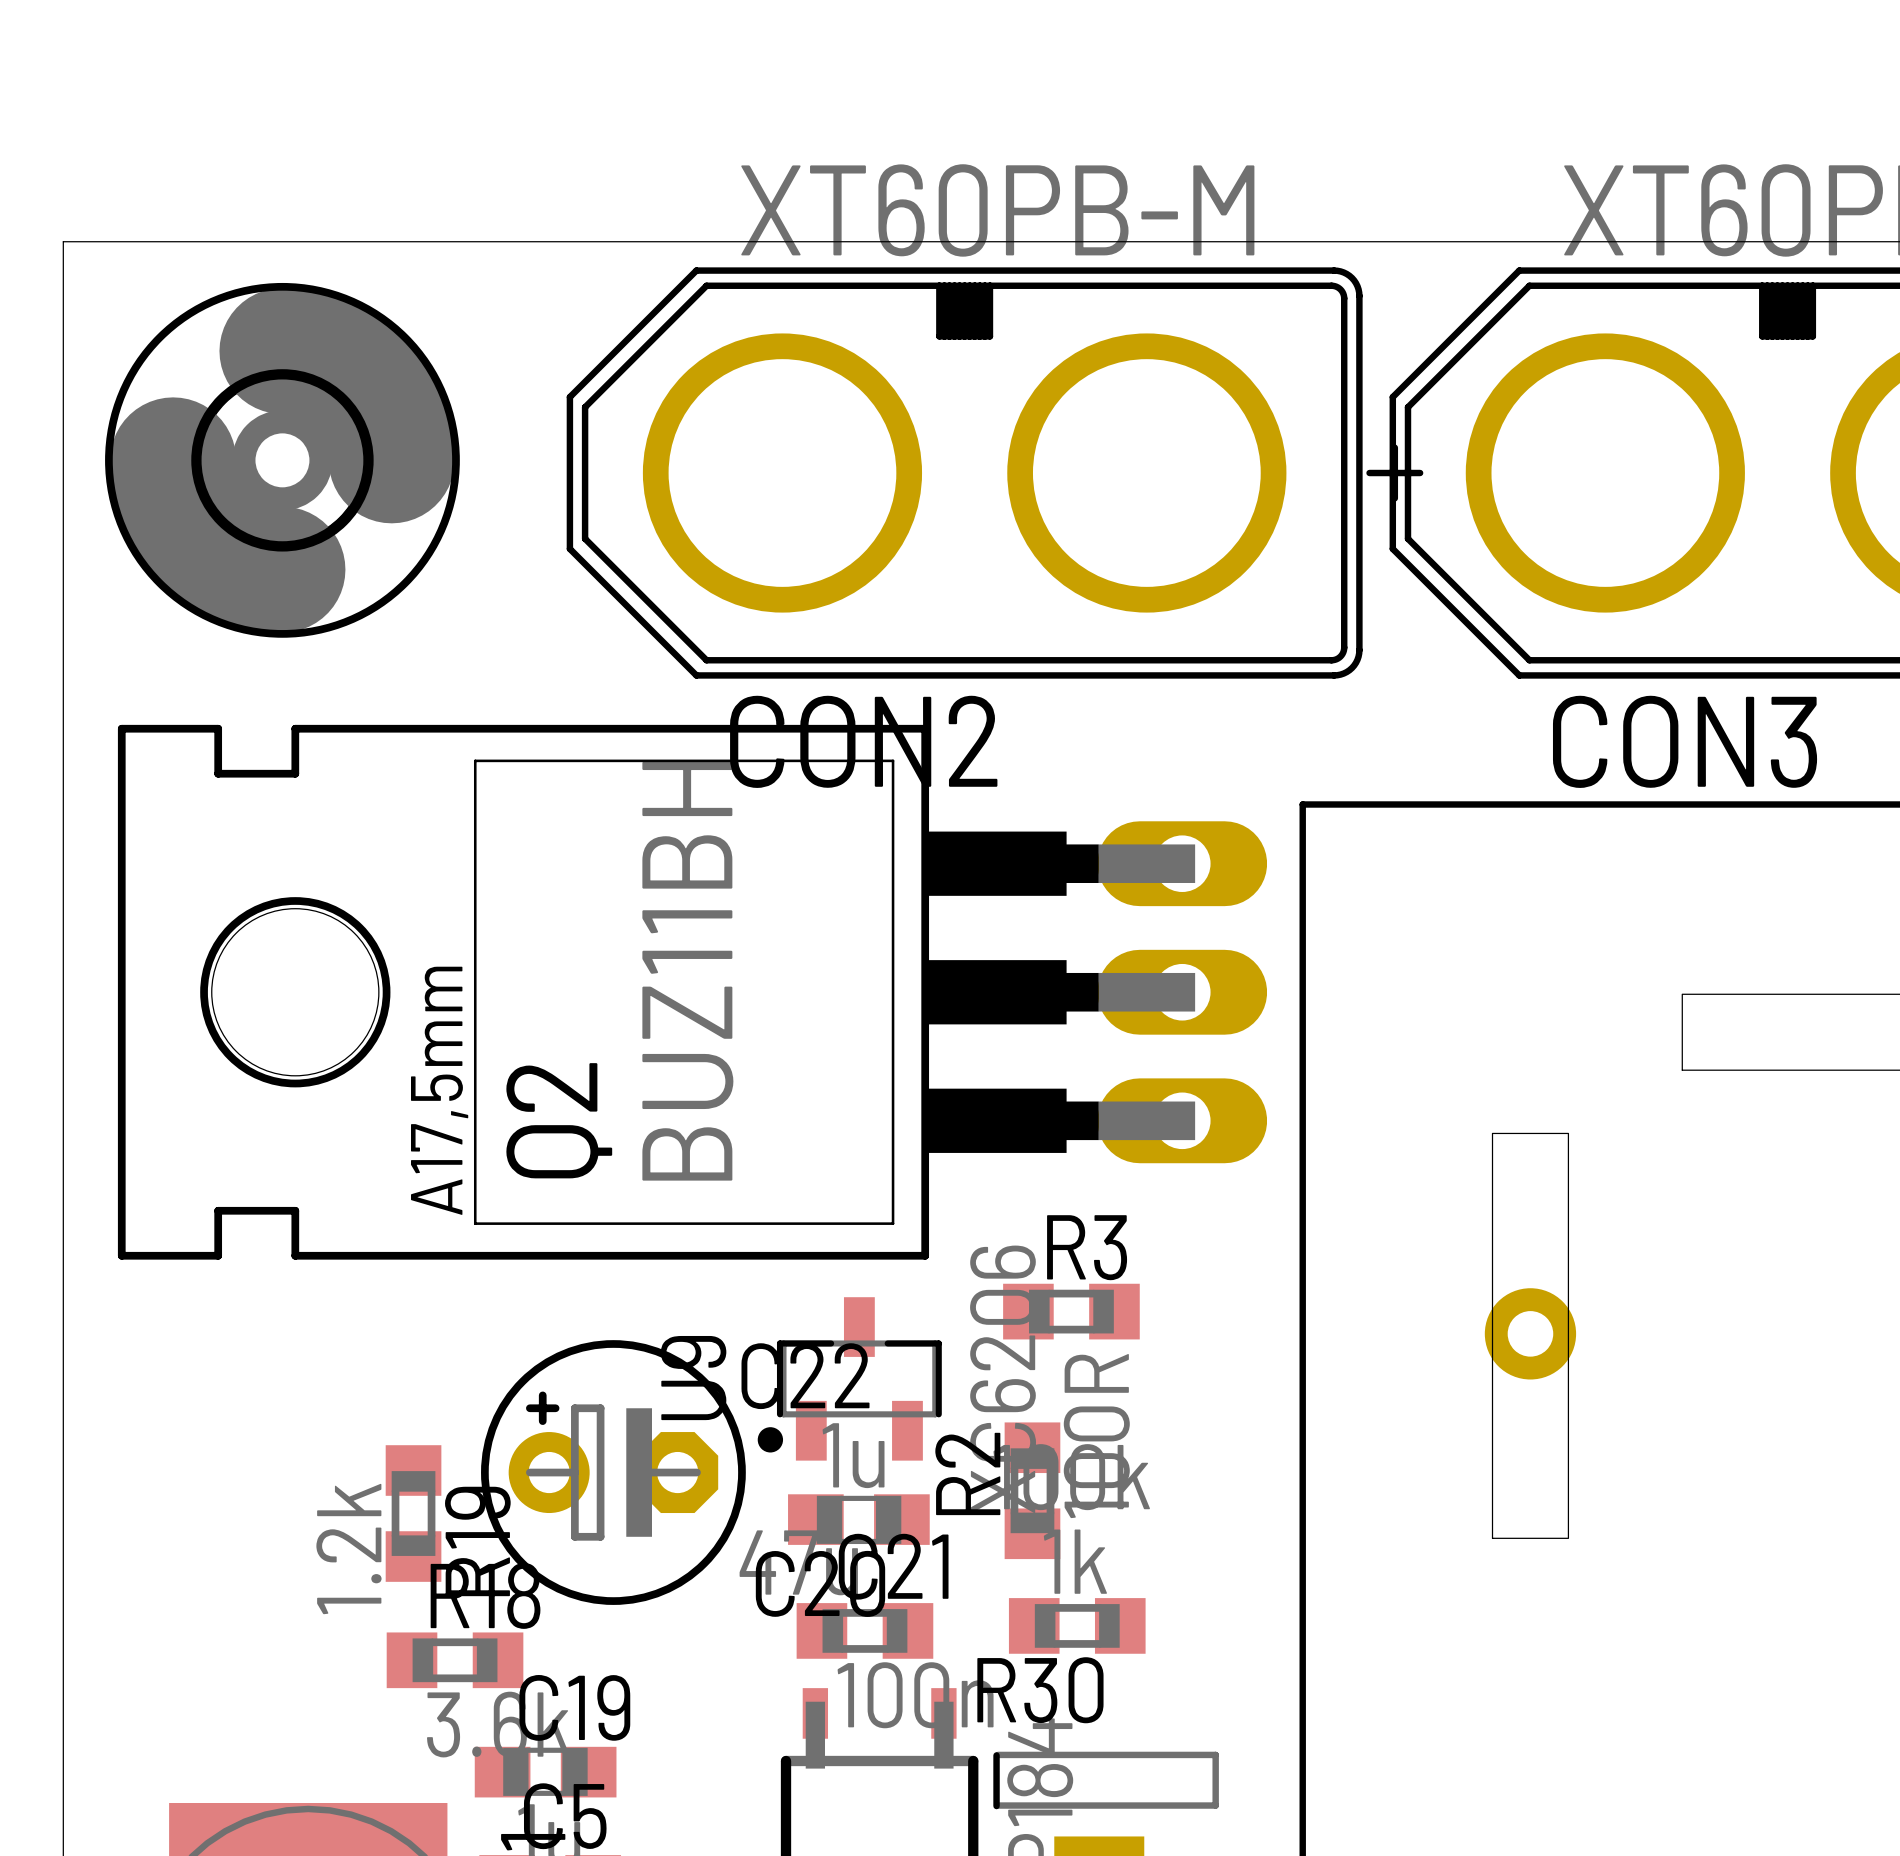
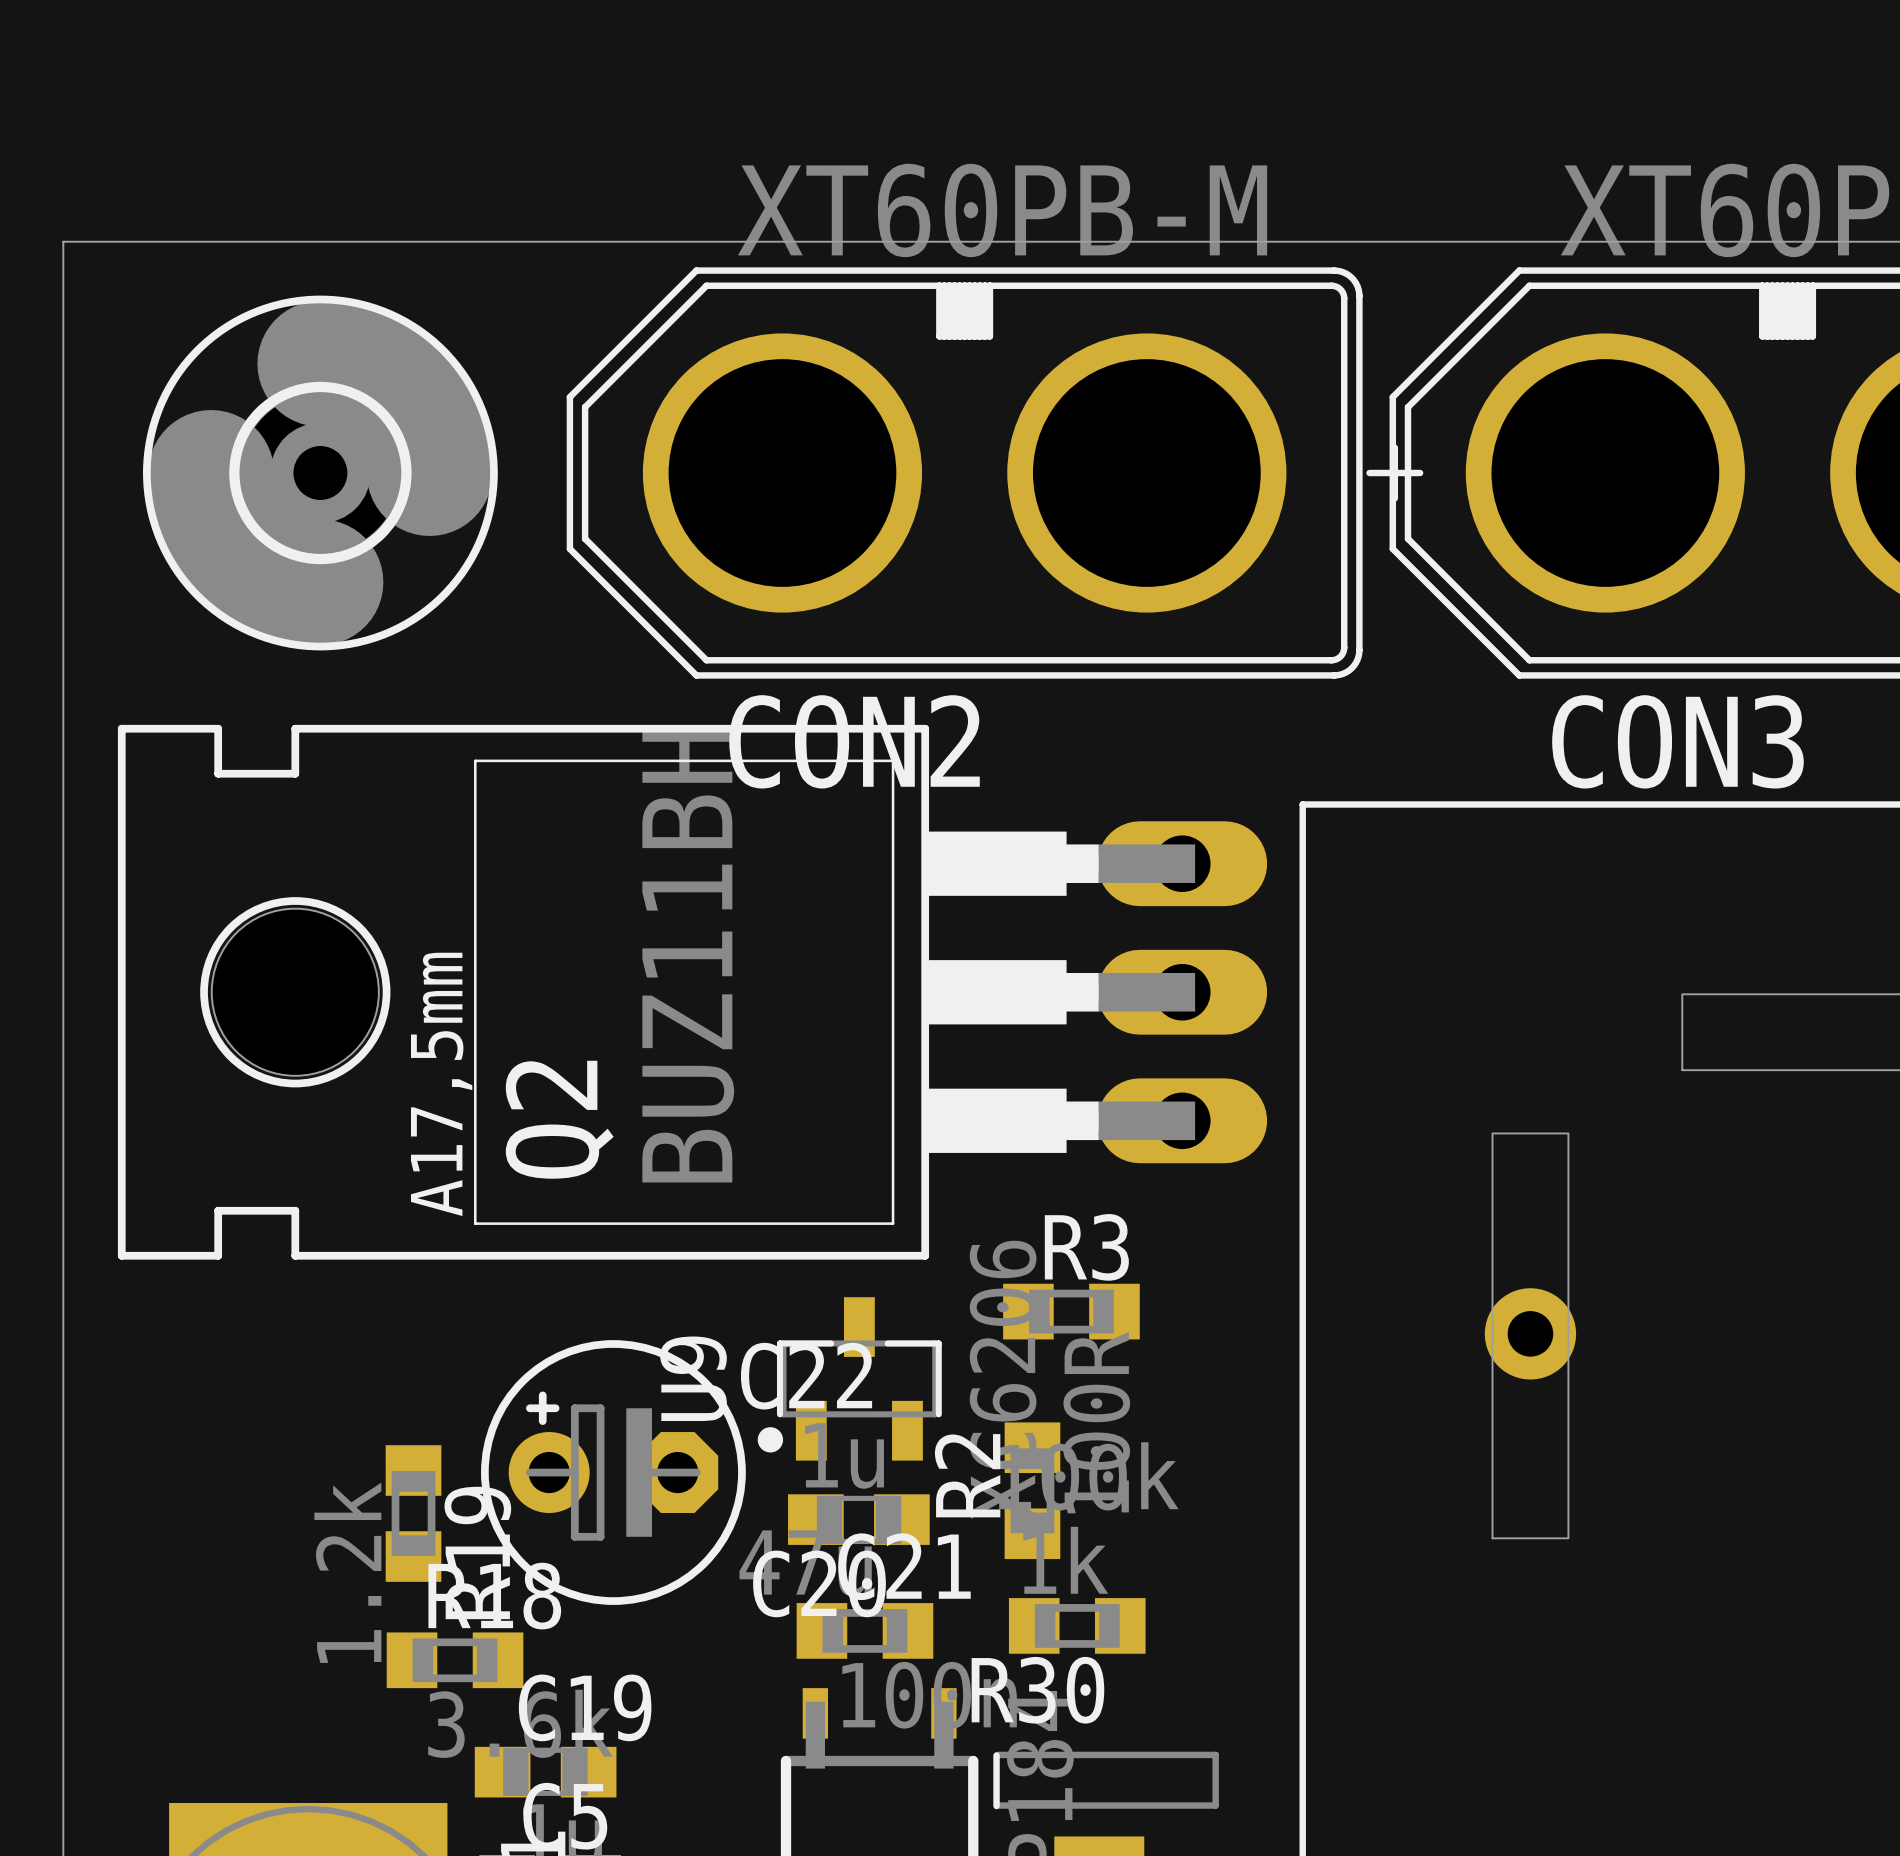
part position: (282, 460) -> (320, 473)

